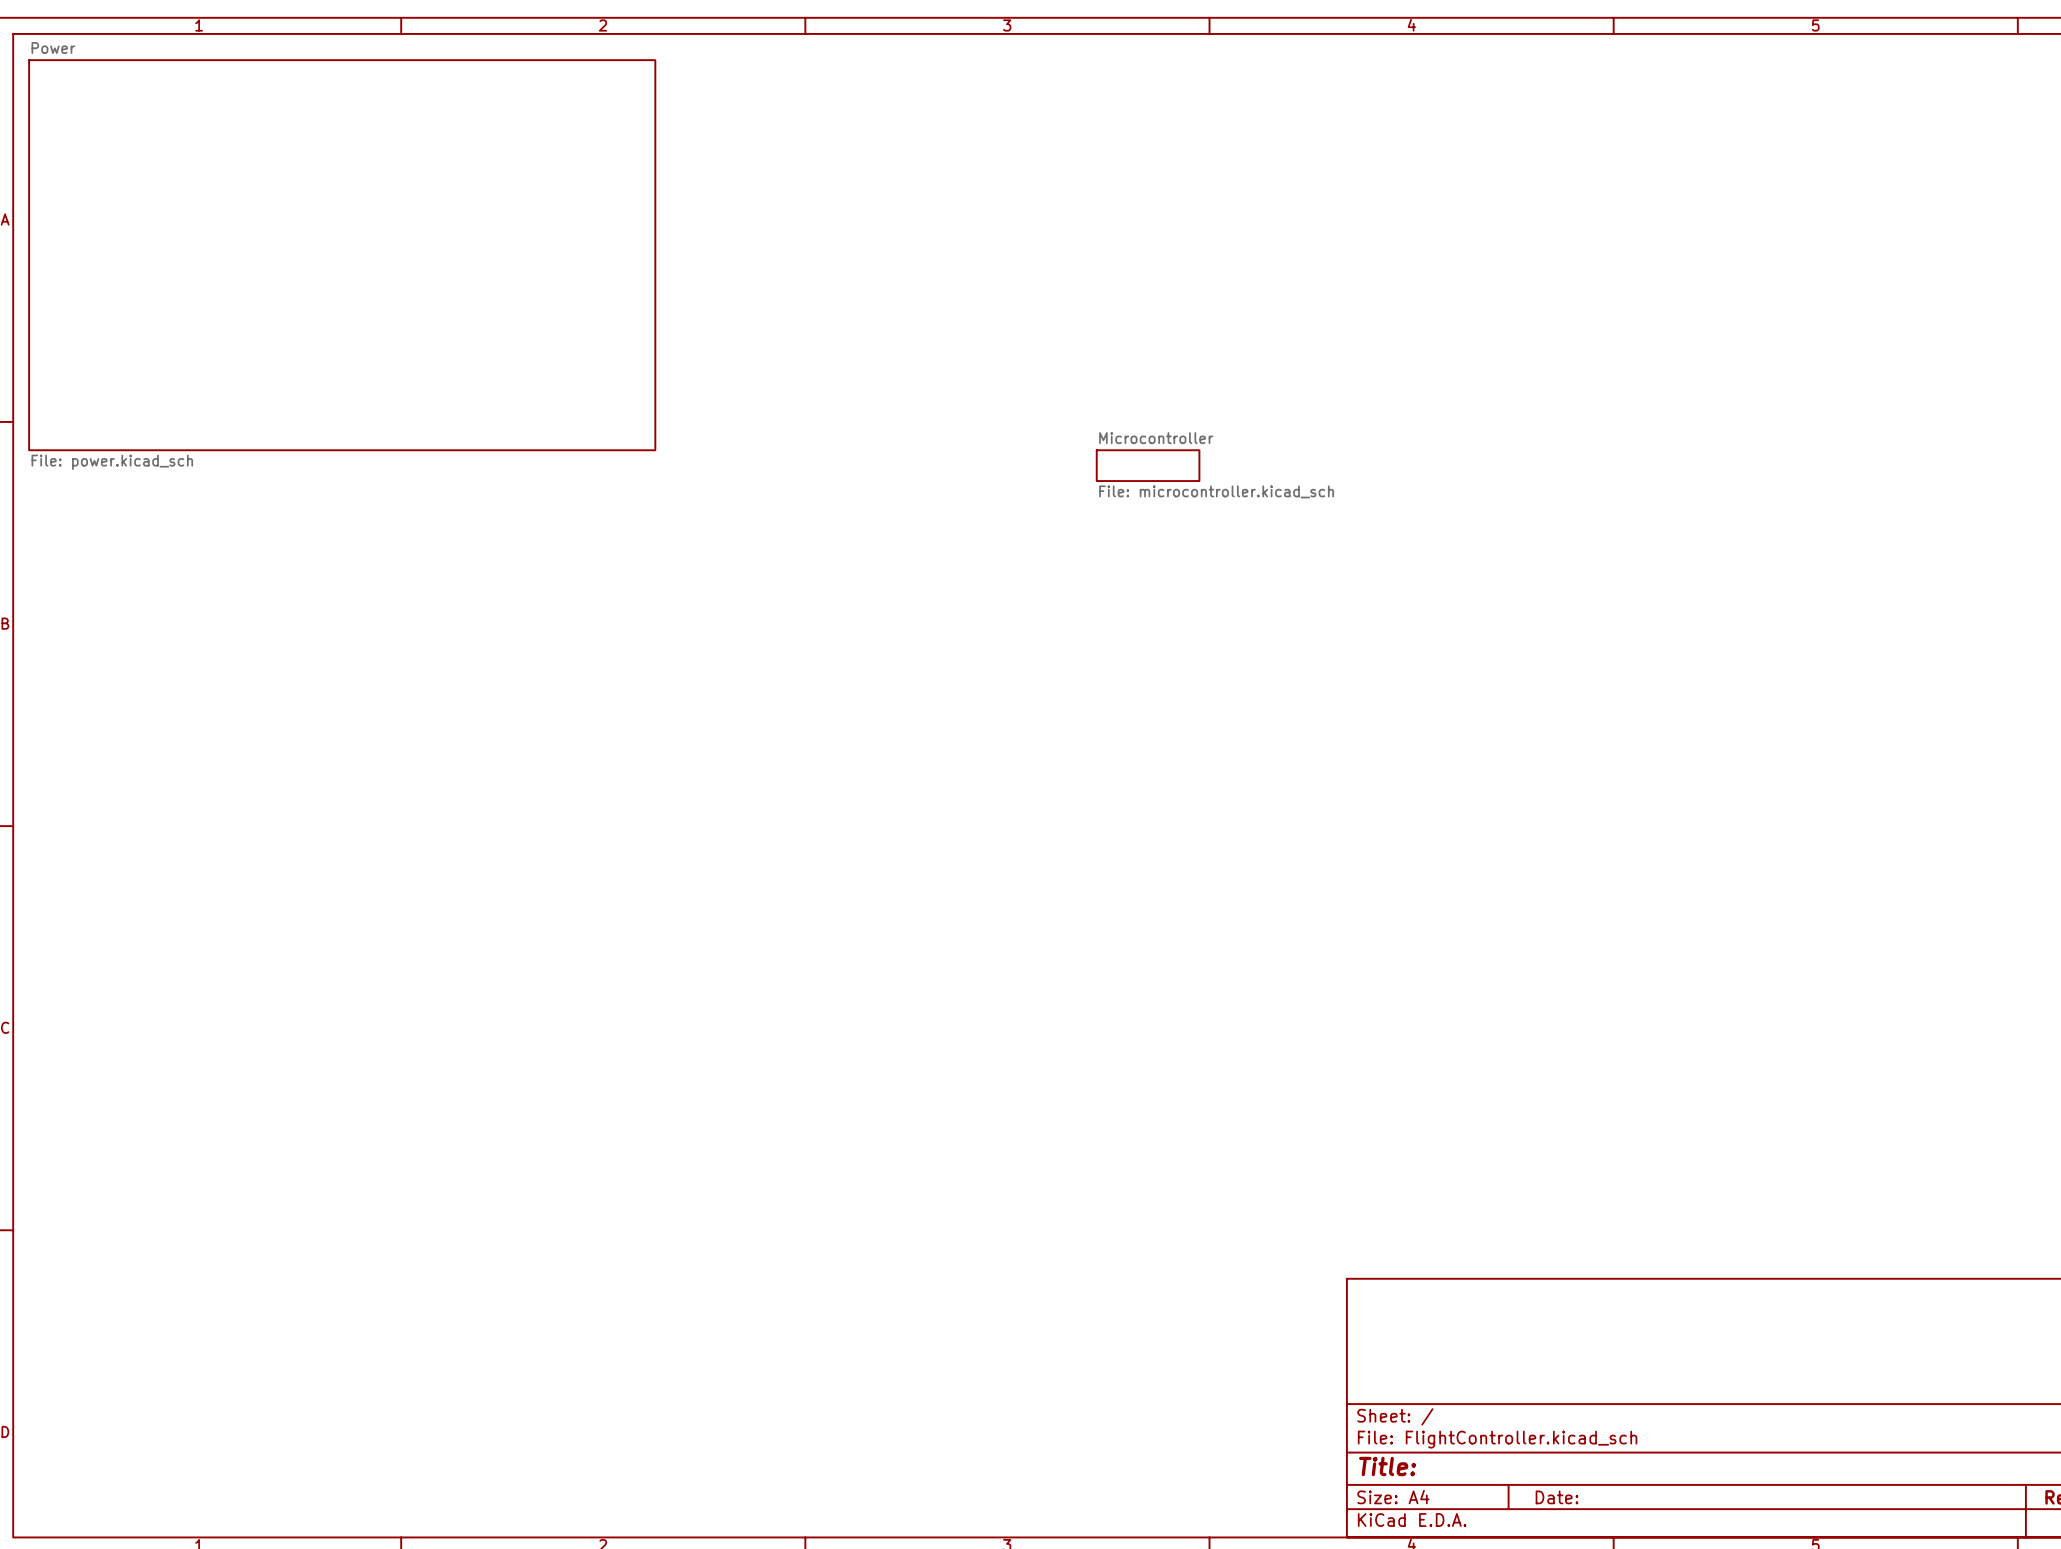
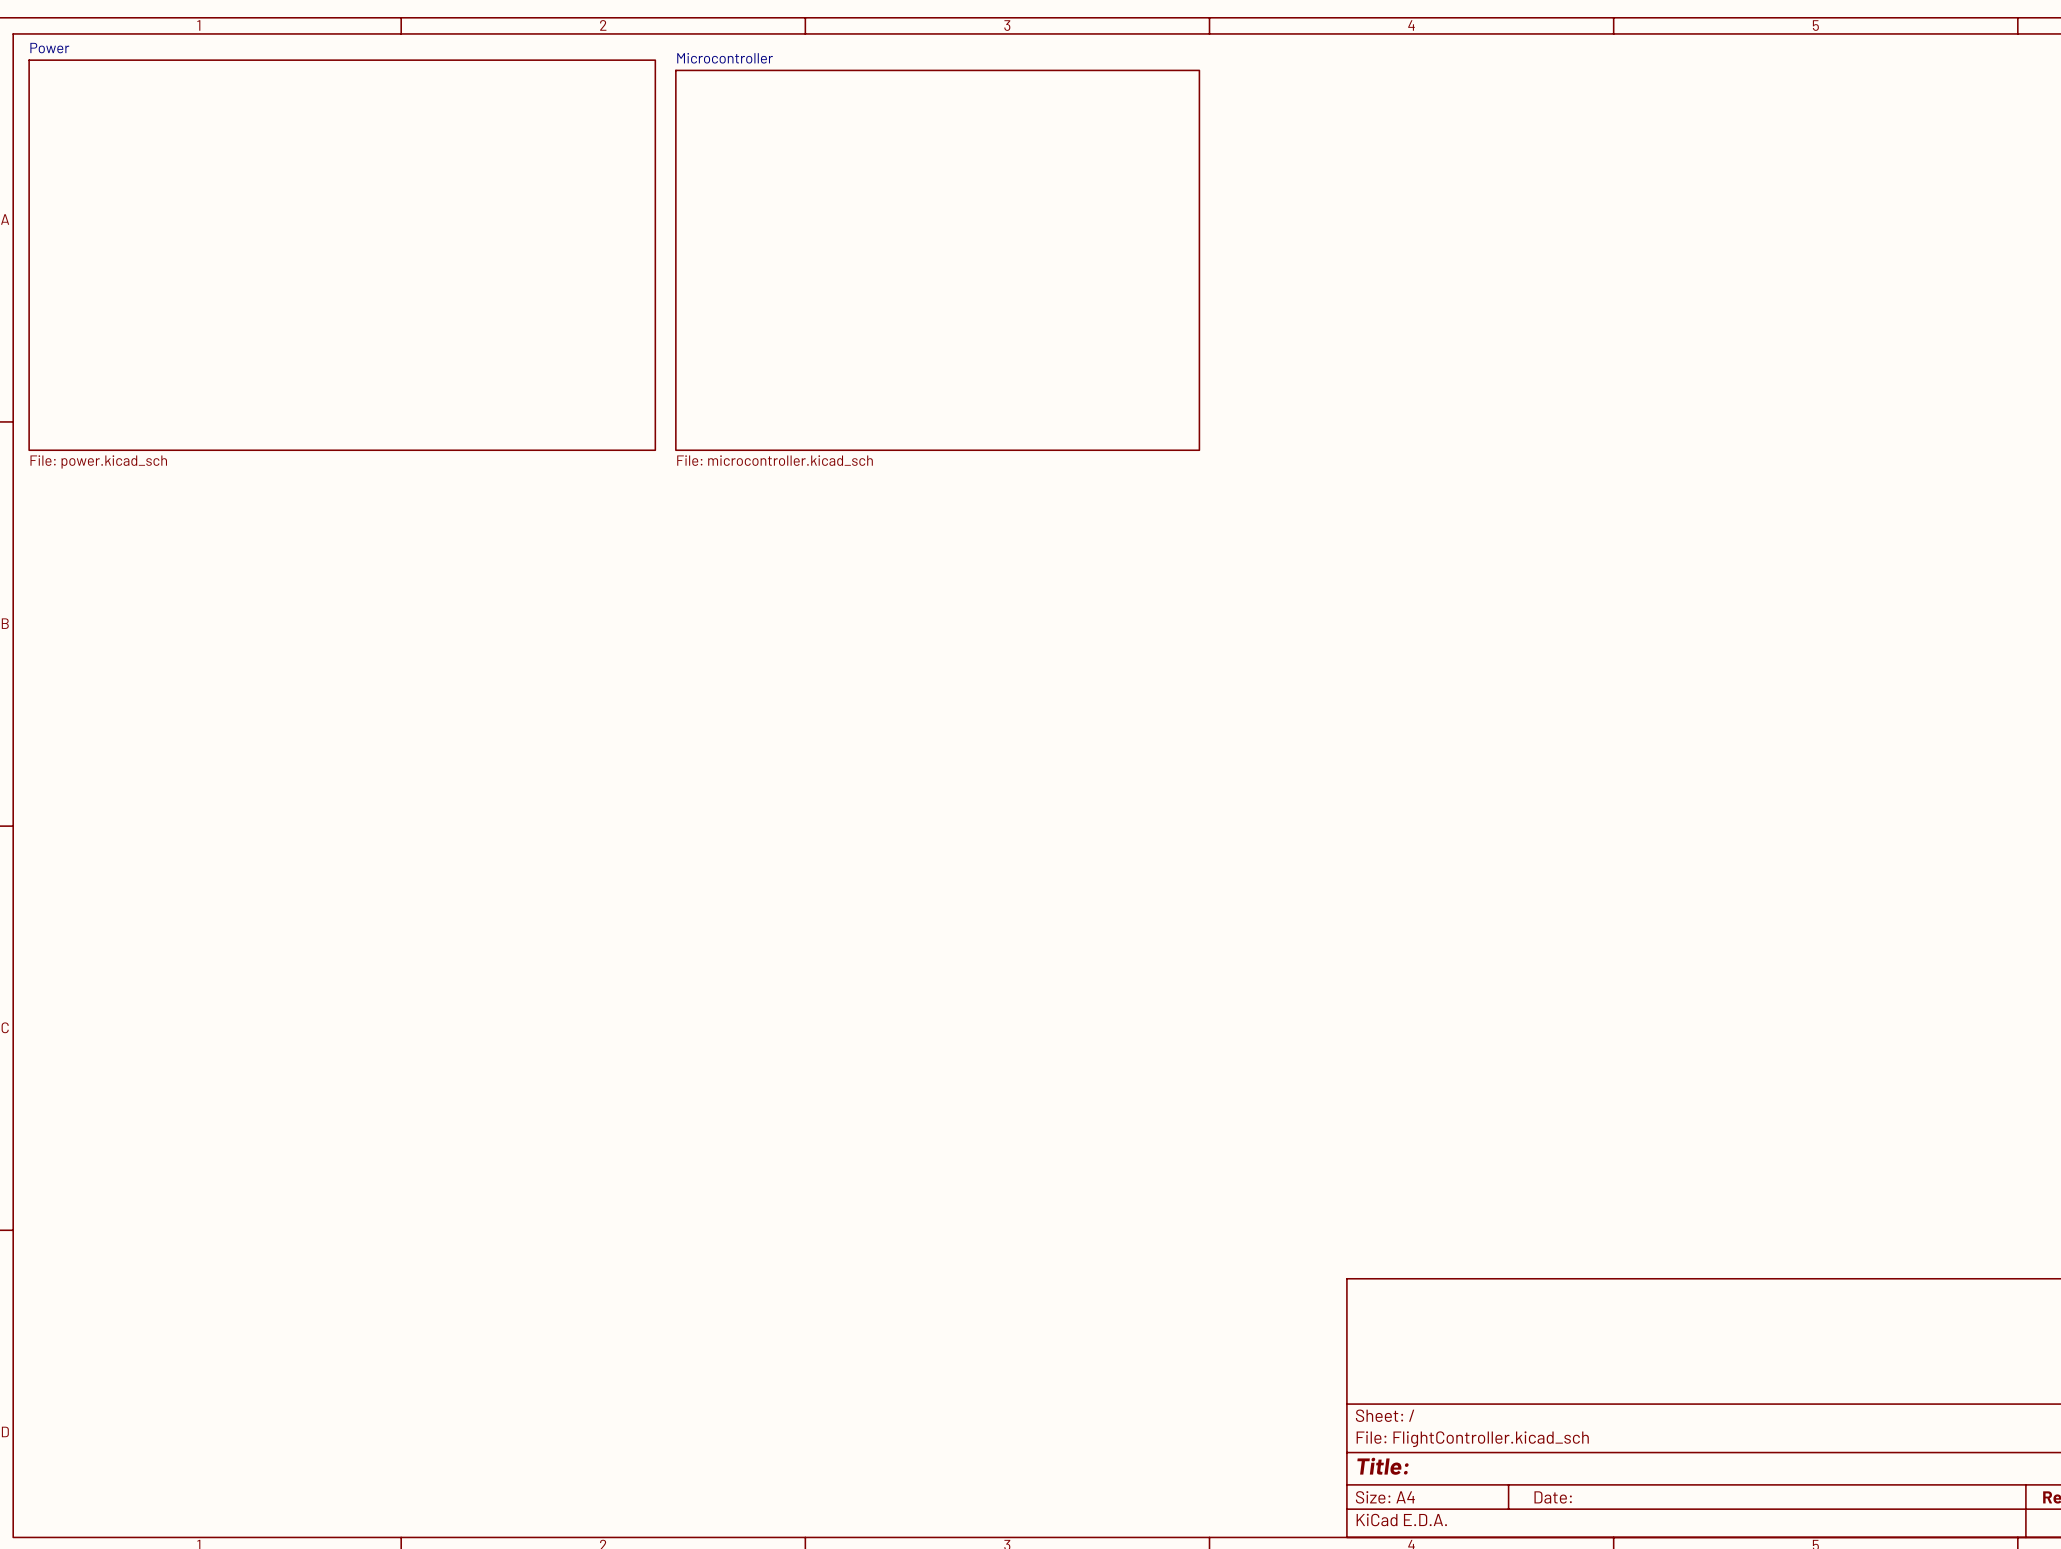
sheet Microcontroller: none -> File: microcontroller.kicad_sch (937, 260)
sheet Microcontroller: File: microcontroller.kicad_sch (1148, 465) -> none

